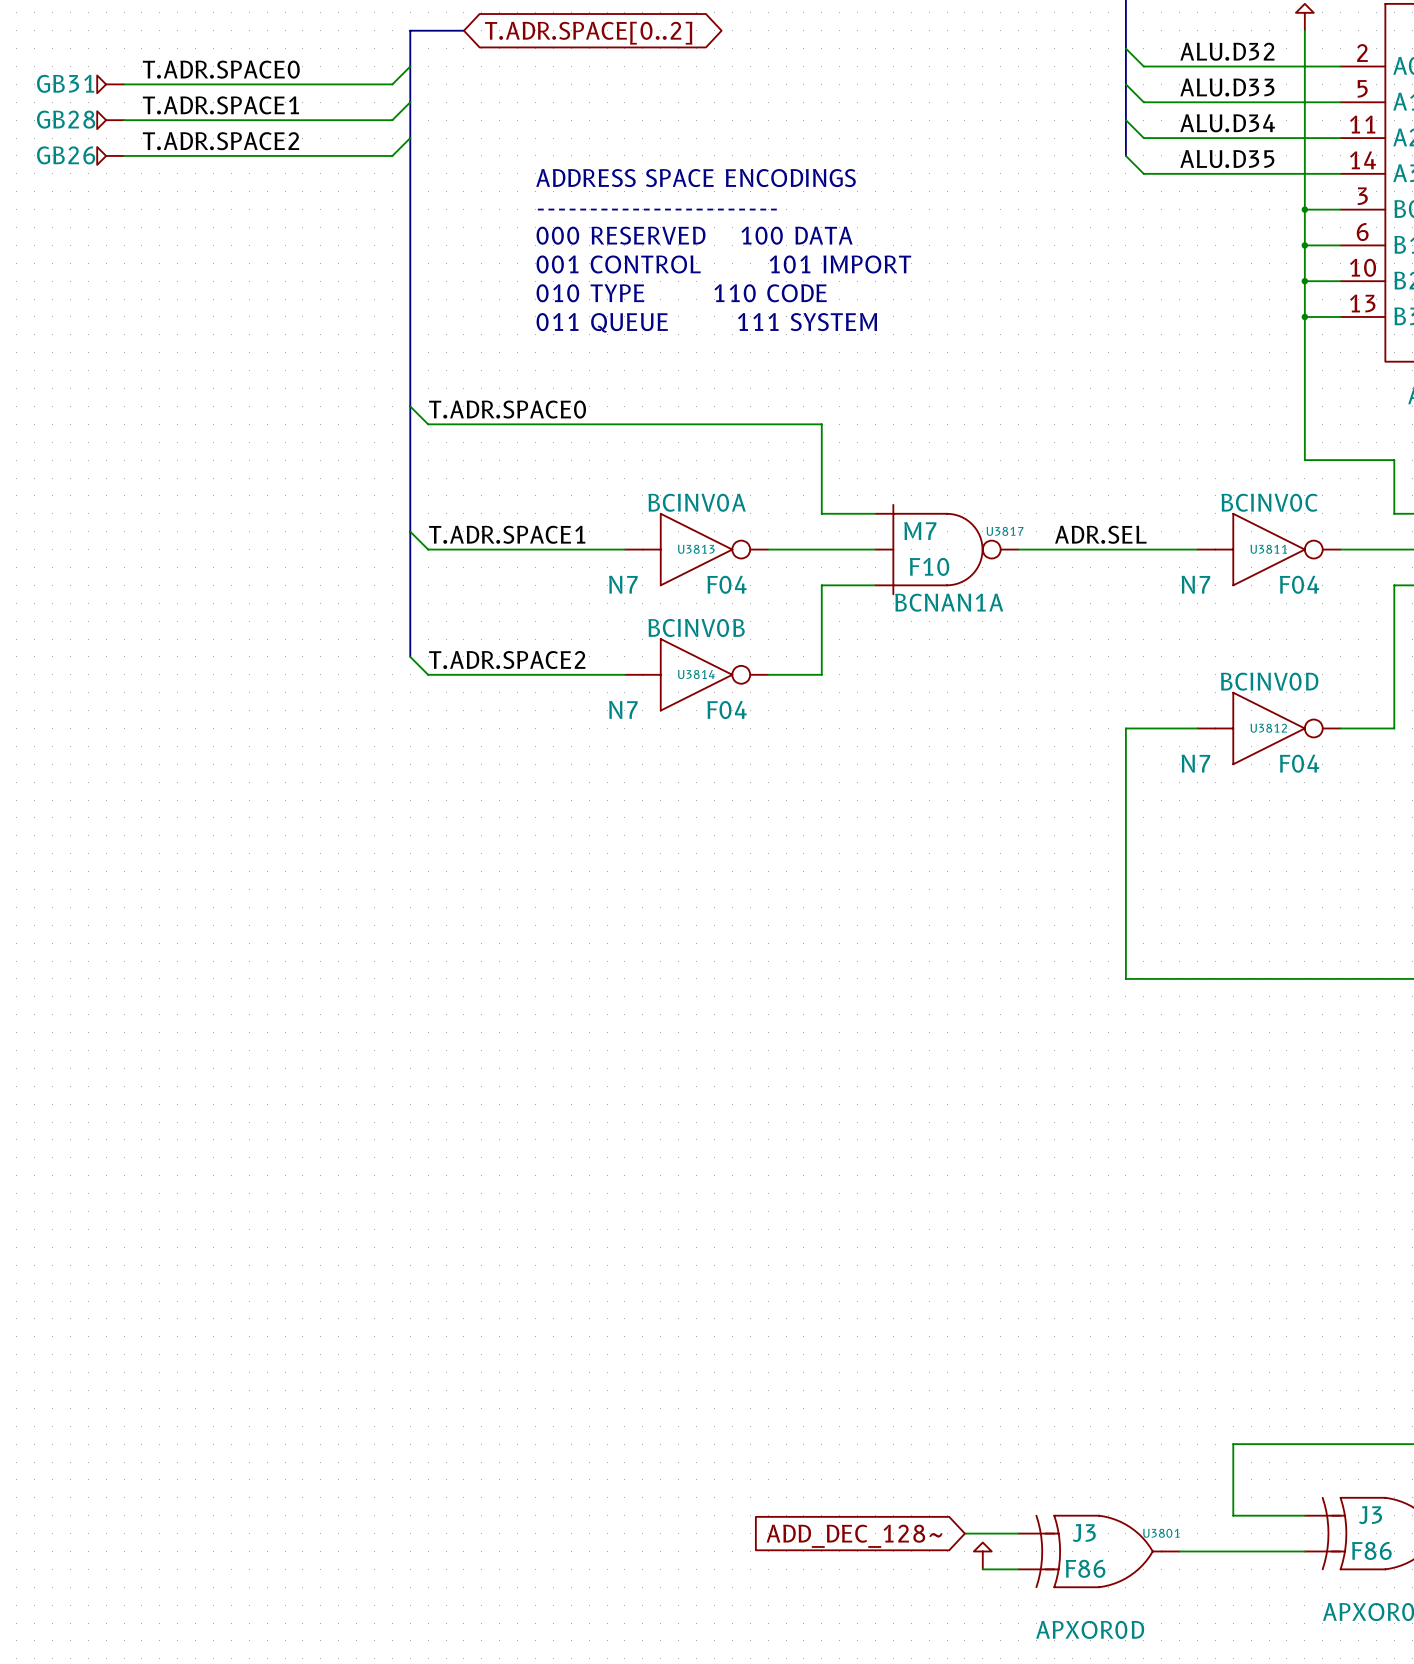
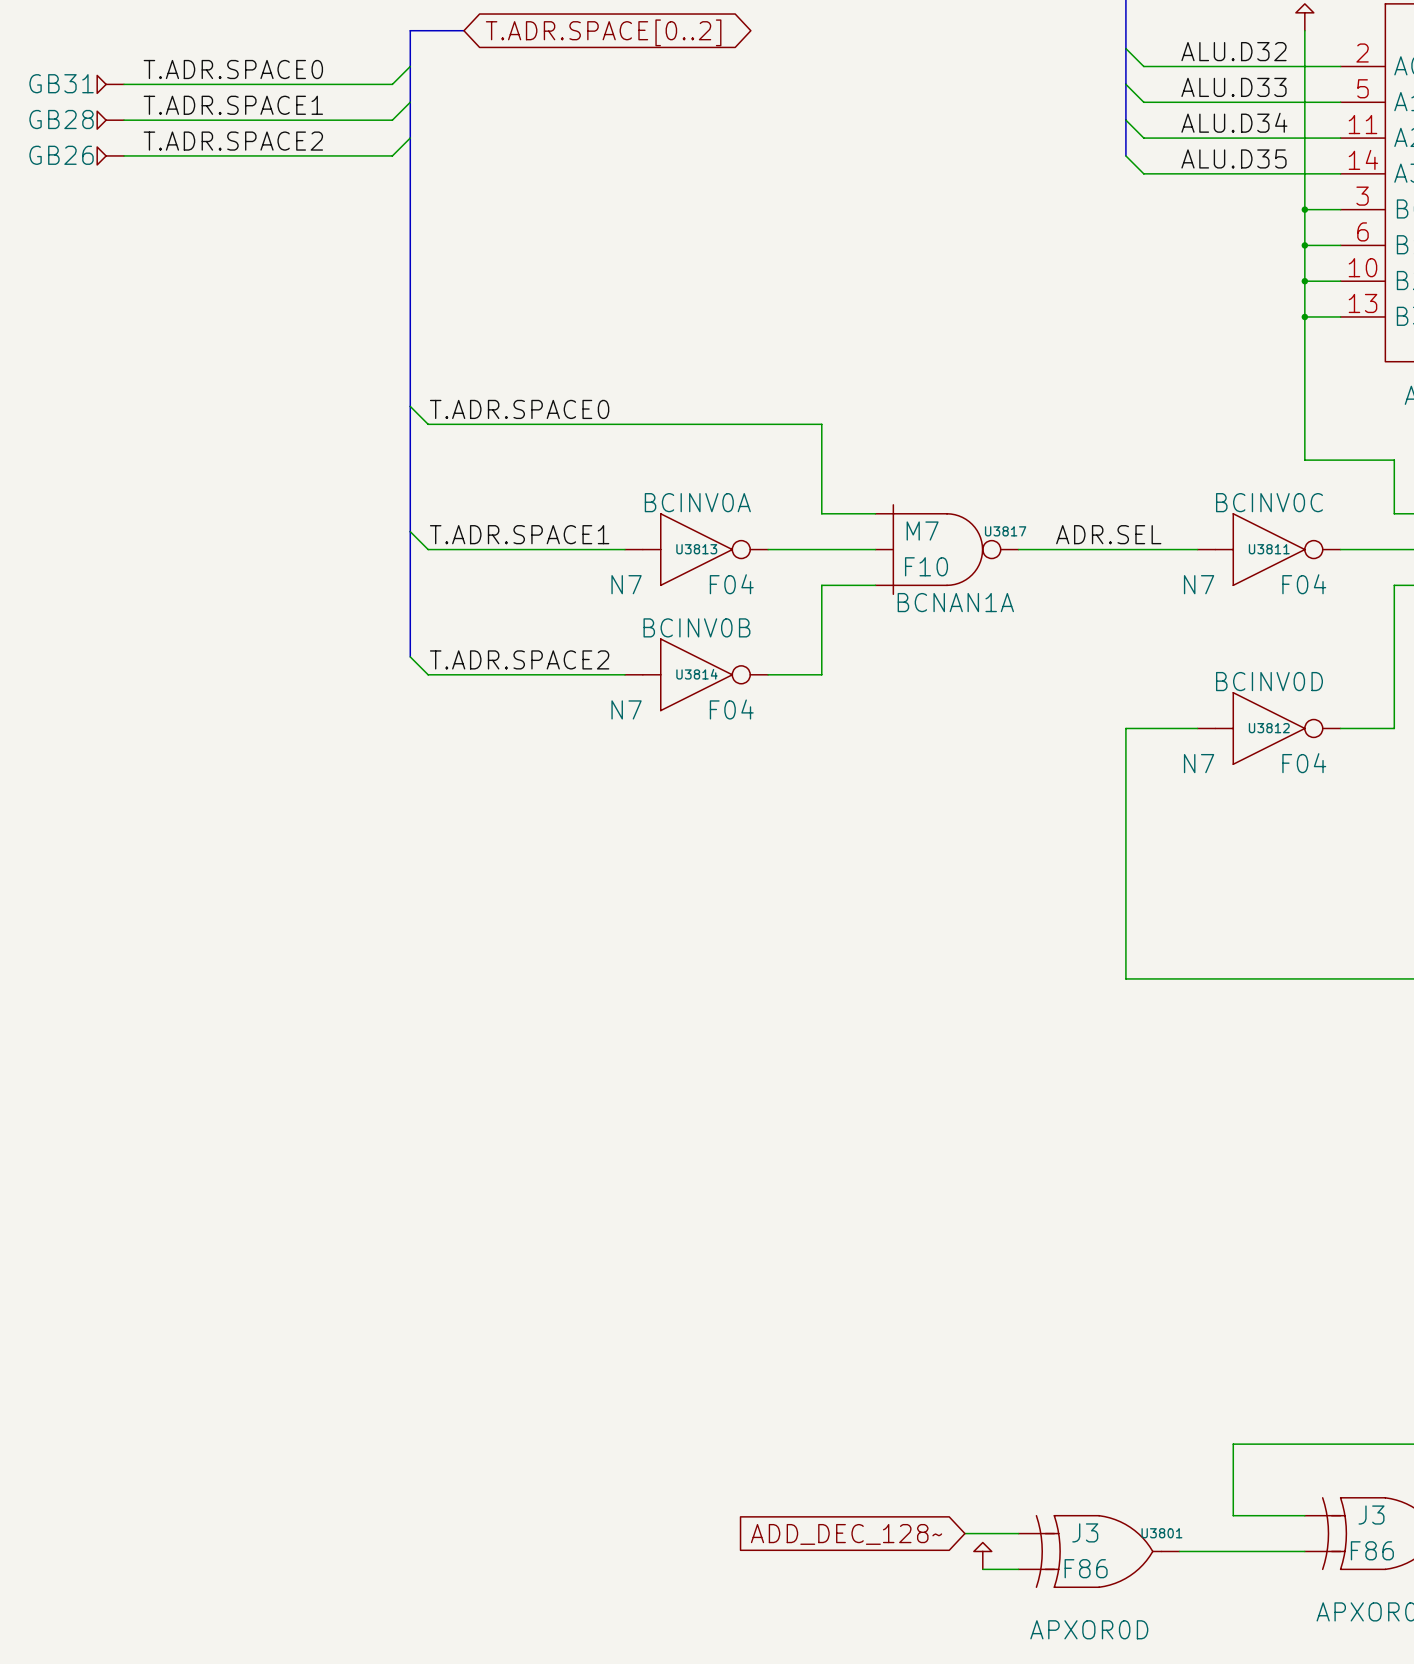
text: ADDRESS SPACE ENCODINGS (696, 178) -> none
text: ----------------------- (657, 209) -> none
text: 000 RESERVED 100 DATA (694, 235) -> none
text: 001 CONTROL 101 IMPORT (723, 264) -> none
text: 010 TYPE 110 CODE (681, 293) -> none
text: 011 QUEUE 111 SYSTEM (706, 322) -> none

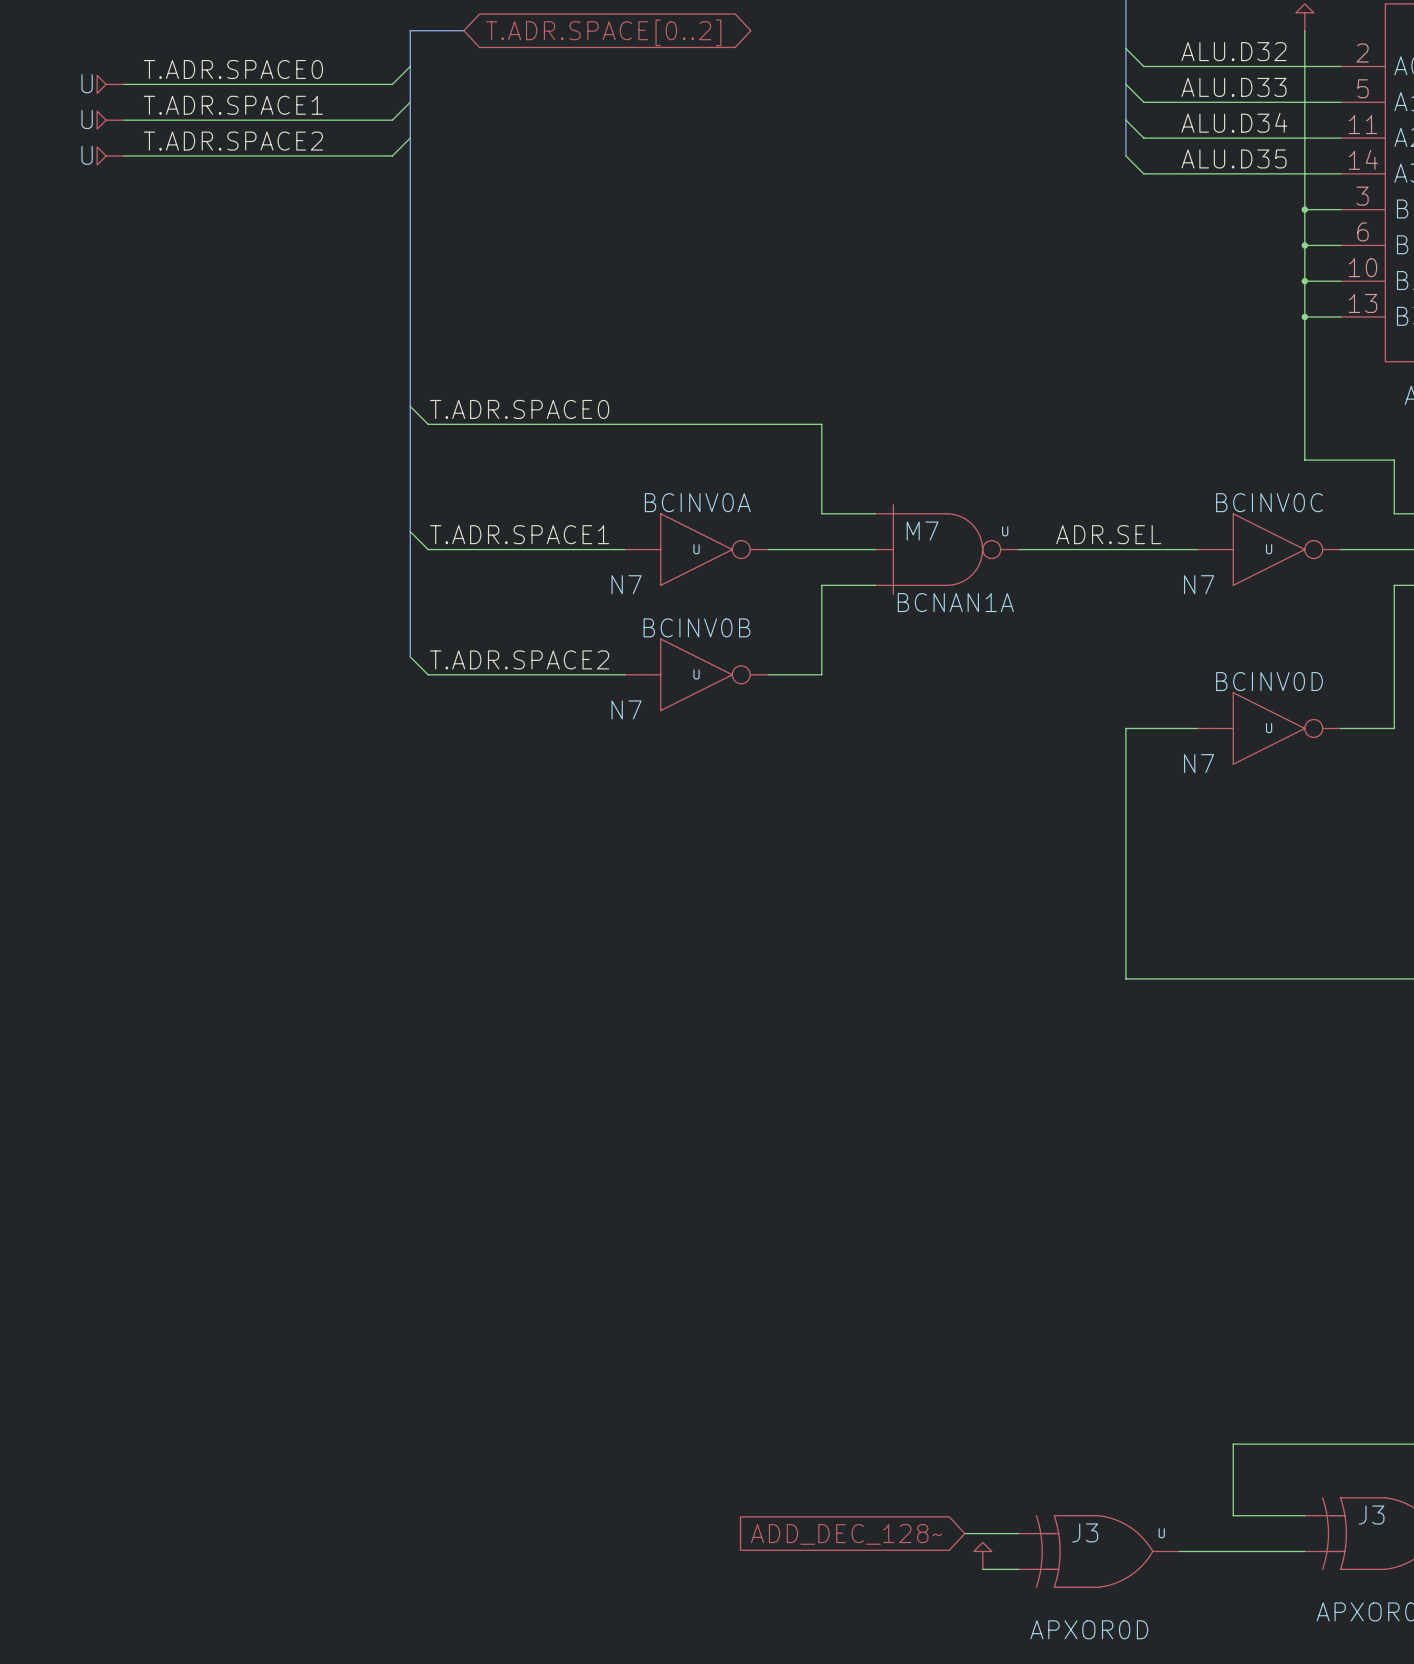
GB31 name: GB31 (61, 83) -> U (87, 83)
GB28 name: GB28 (61, 119) -> U (87, 119)
GB26 name: GB26 (61, 155) -> U (87, 155)
U3817 name: U3817 (1005, 531) -> U (1005, 531)
U3813 name: U3813 (696, 549) -> U (696, 549)
U3811 name: U3811 (1269, 549) -> U (1269, 549)
U3817 value: F10 (926, 566) -> none
U3813 value: F04 (731, 584) -> none
U3811 value: F04 (1304, 584) -> none
U3814 name: U3814 (696, 674) -> U (696, 674)
U3814 value: F04 (731, 709) -> none
U3812 name: U3812 (1269, 728) -> U (1269, 728)
U3812 value: F04 (1304, 763) -> none
U3801 name: U3801 (1161, 1533) -> U (1161, 1533)
part value: F86 (1372, 1550) -> none
U3801 value: F86 (1086, 1568) -> none

